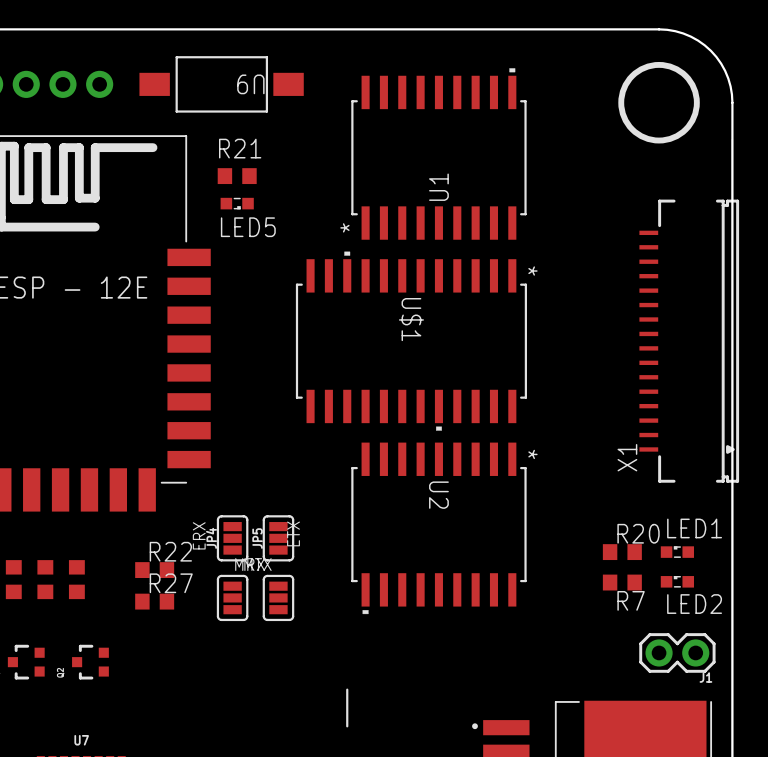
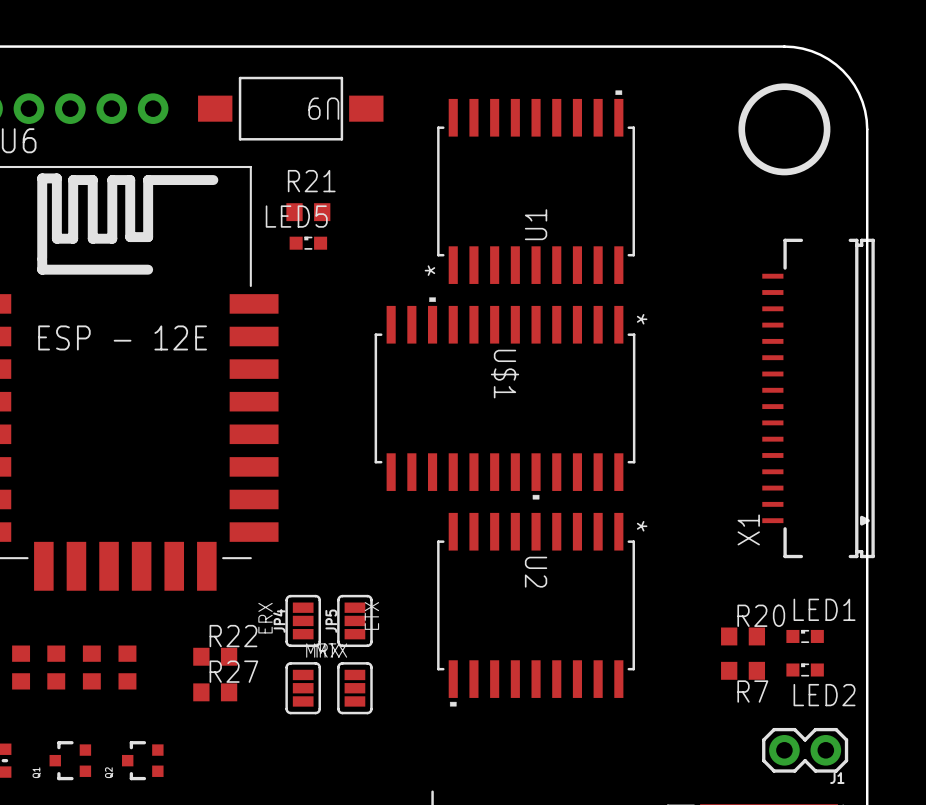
LED5 rotation: 0° (237, 203) -> 180° (308, 243)

